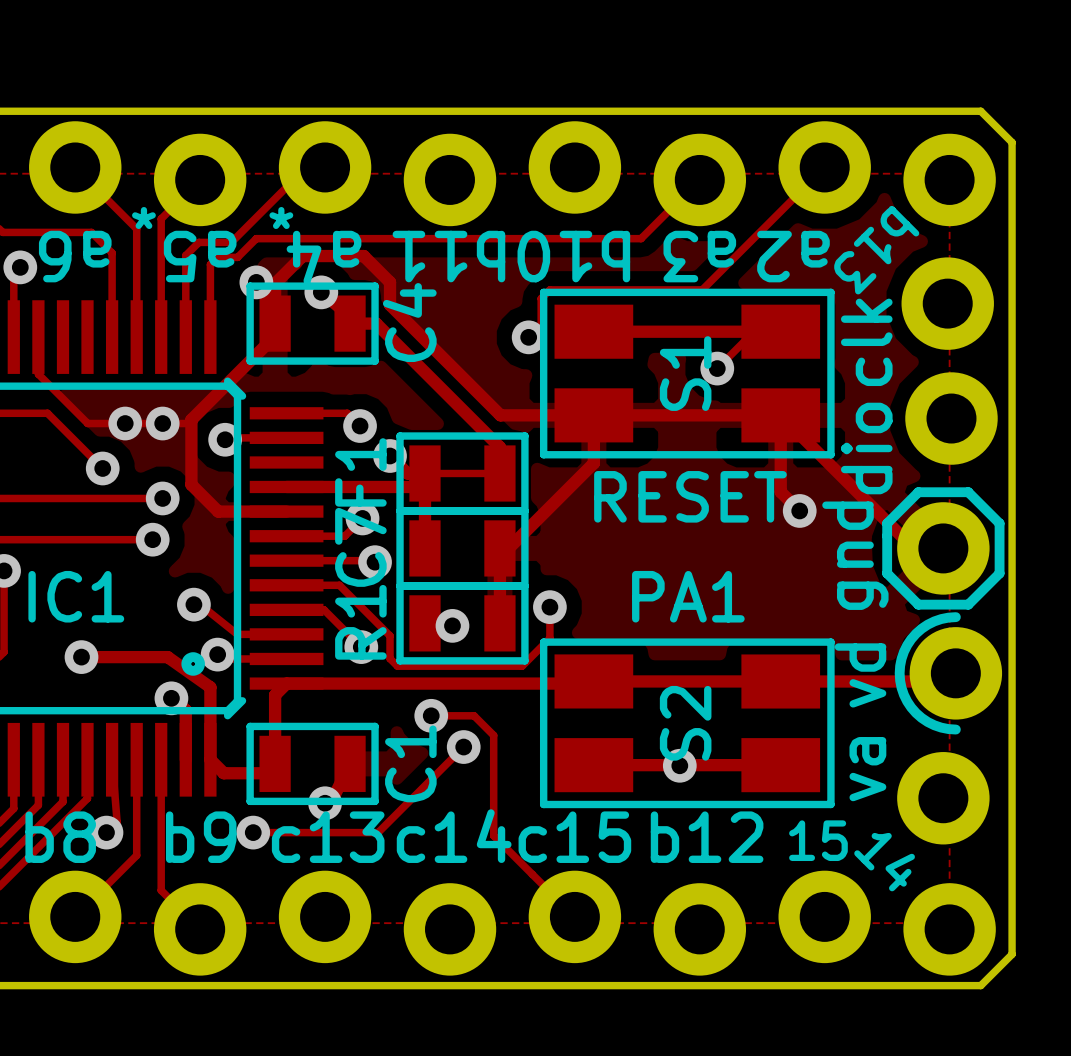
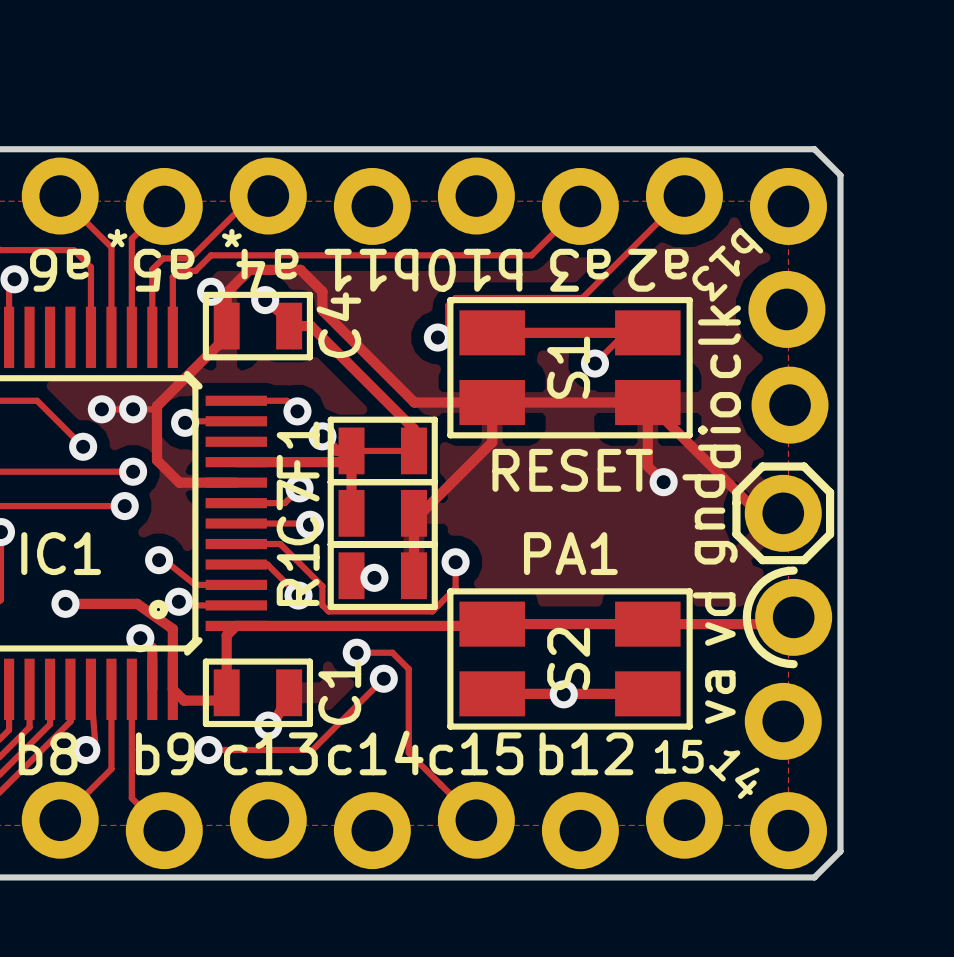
track: (38, 337) (38, 374) (87, 423) (125, 423) -> none

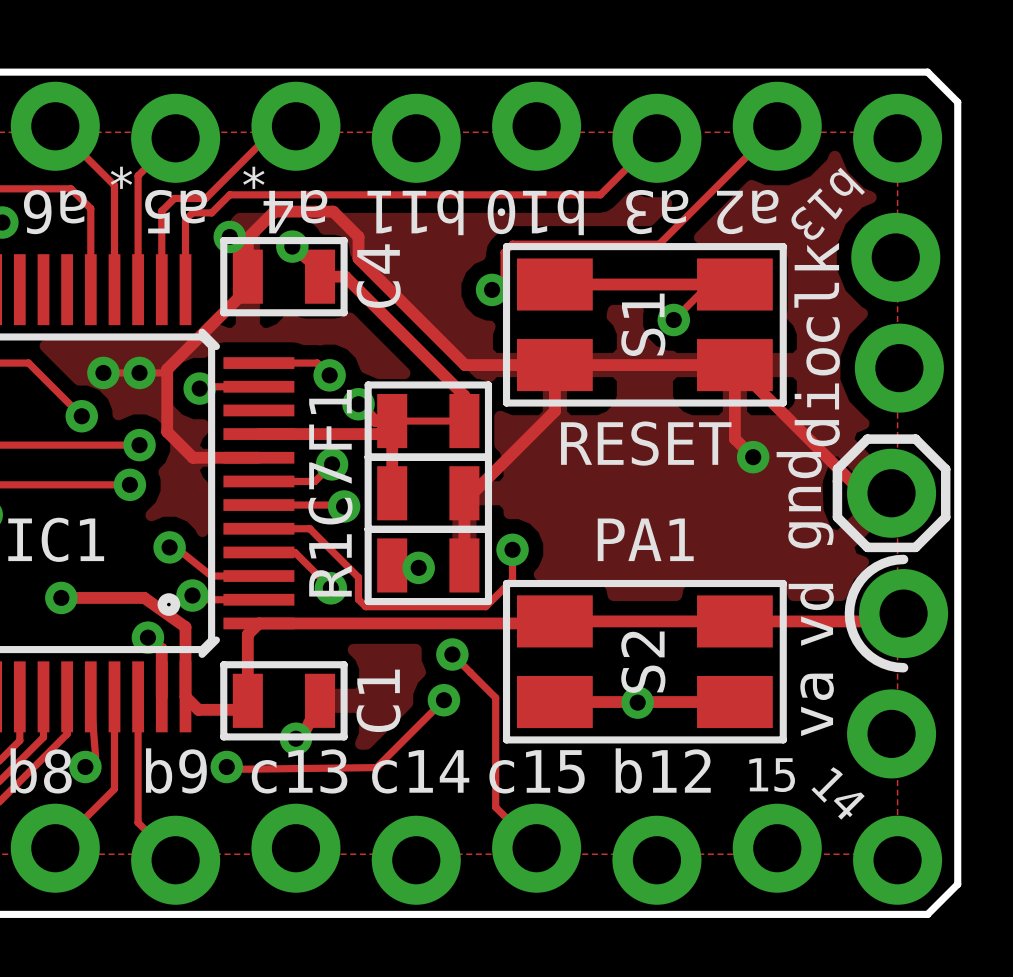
track: (356, 652) (392, 652) (408, 669) (408, 752) (441, 784) -> (452, 654) (495, 697) (495, 807)
via: (356, 652) -> none
via: none -> (452, 654)
track: (383, 678) (312, 750) (208, 750) -> none
via: (383, 678) -> none
track: none -> (443, 700) (376, 767) (229, 769)
via: none -> (443, 700)

